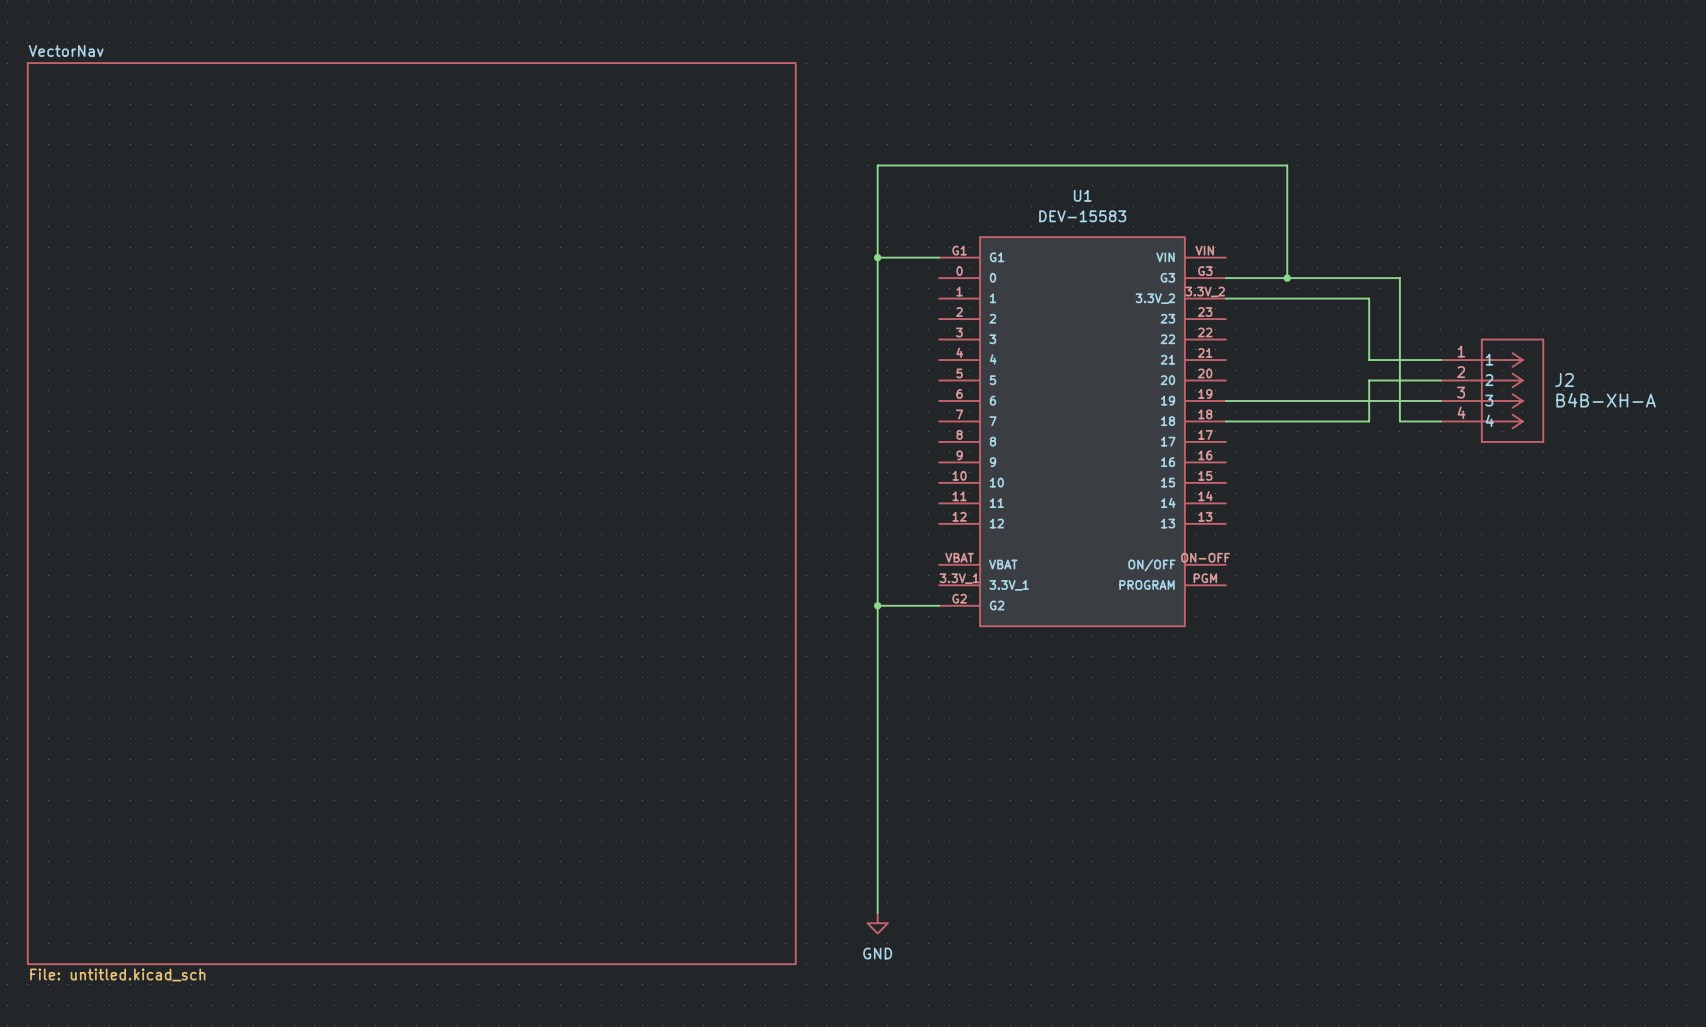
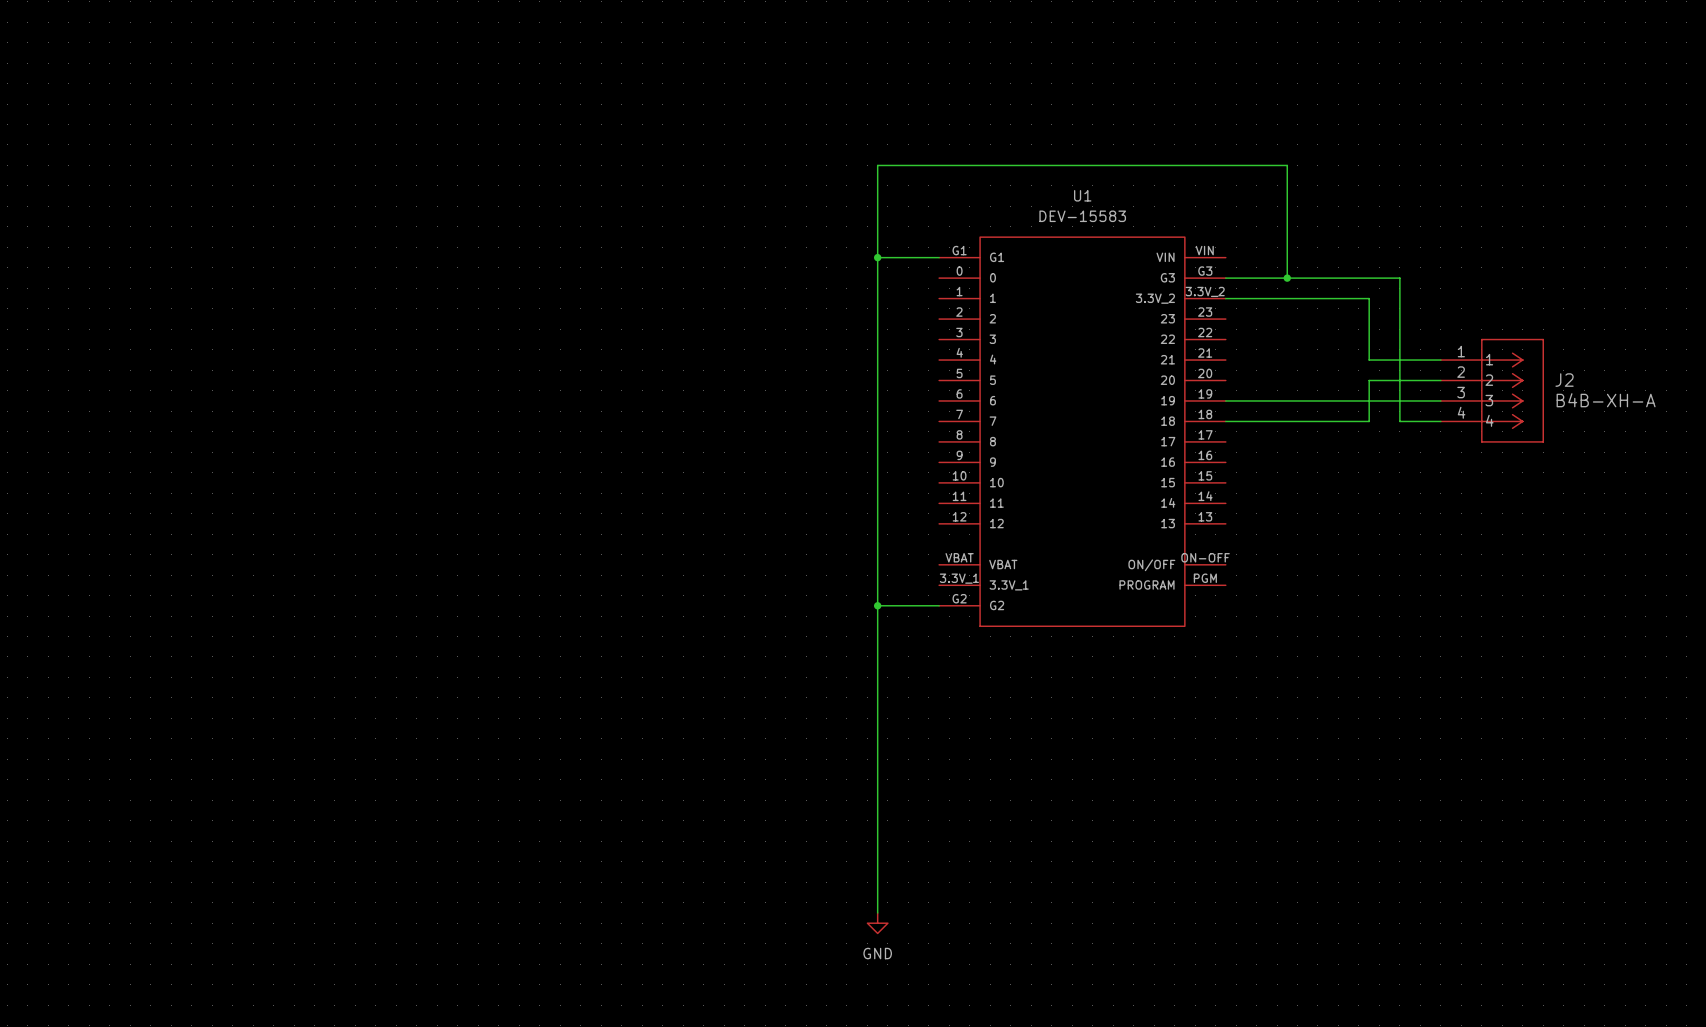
sheet VectorNav: File: untitled.kicad_sch (411, 513) -> none

